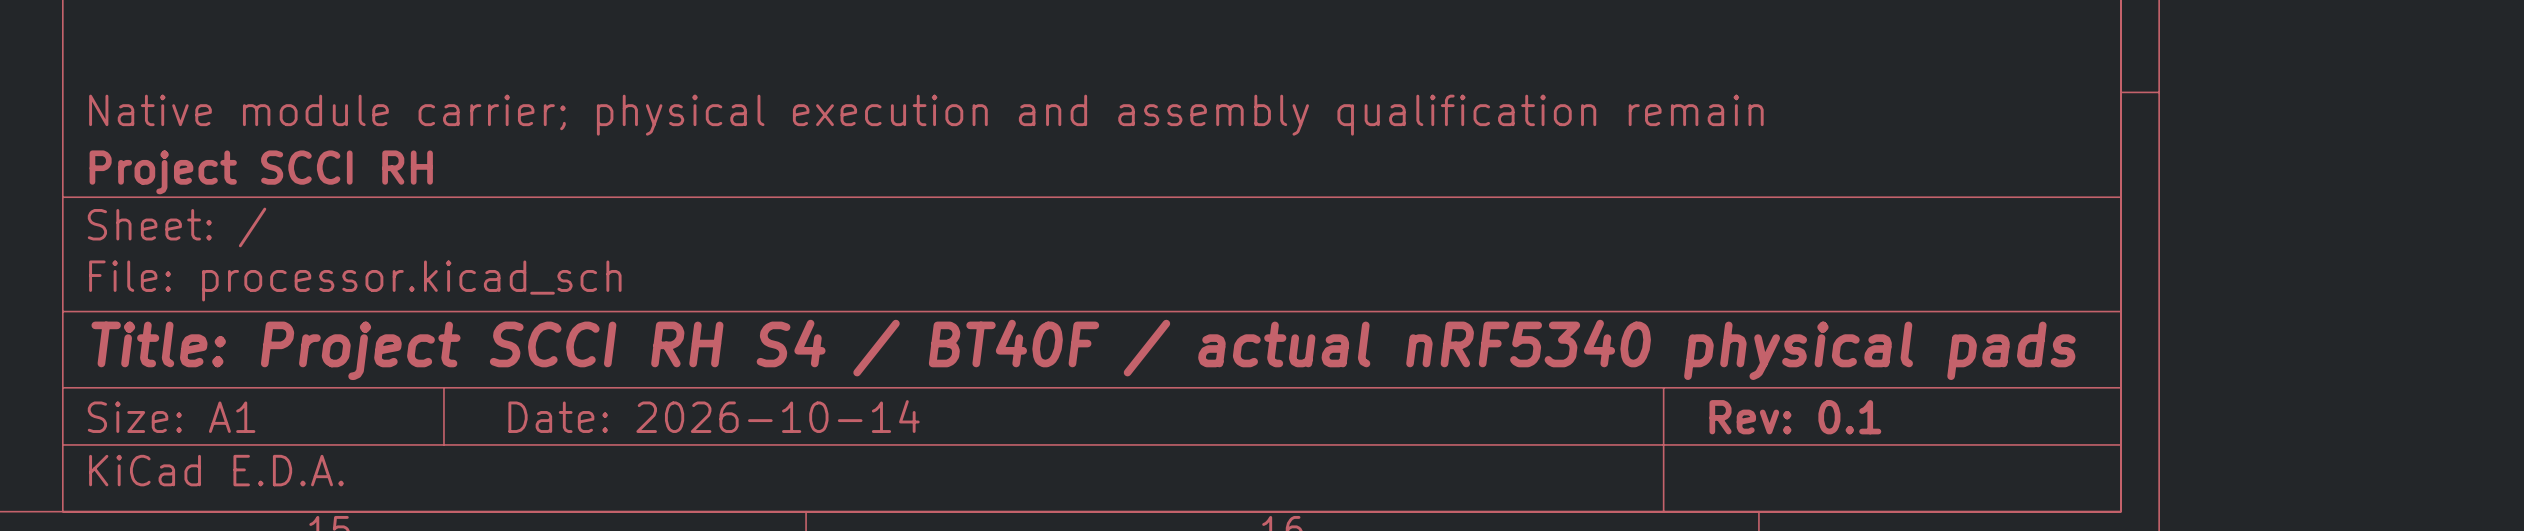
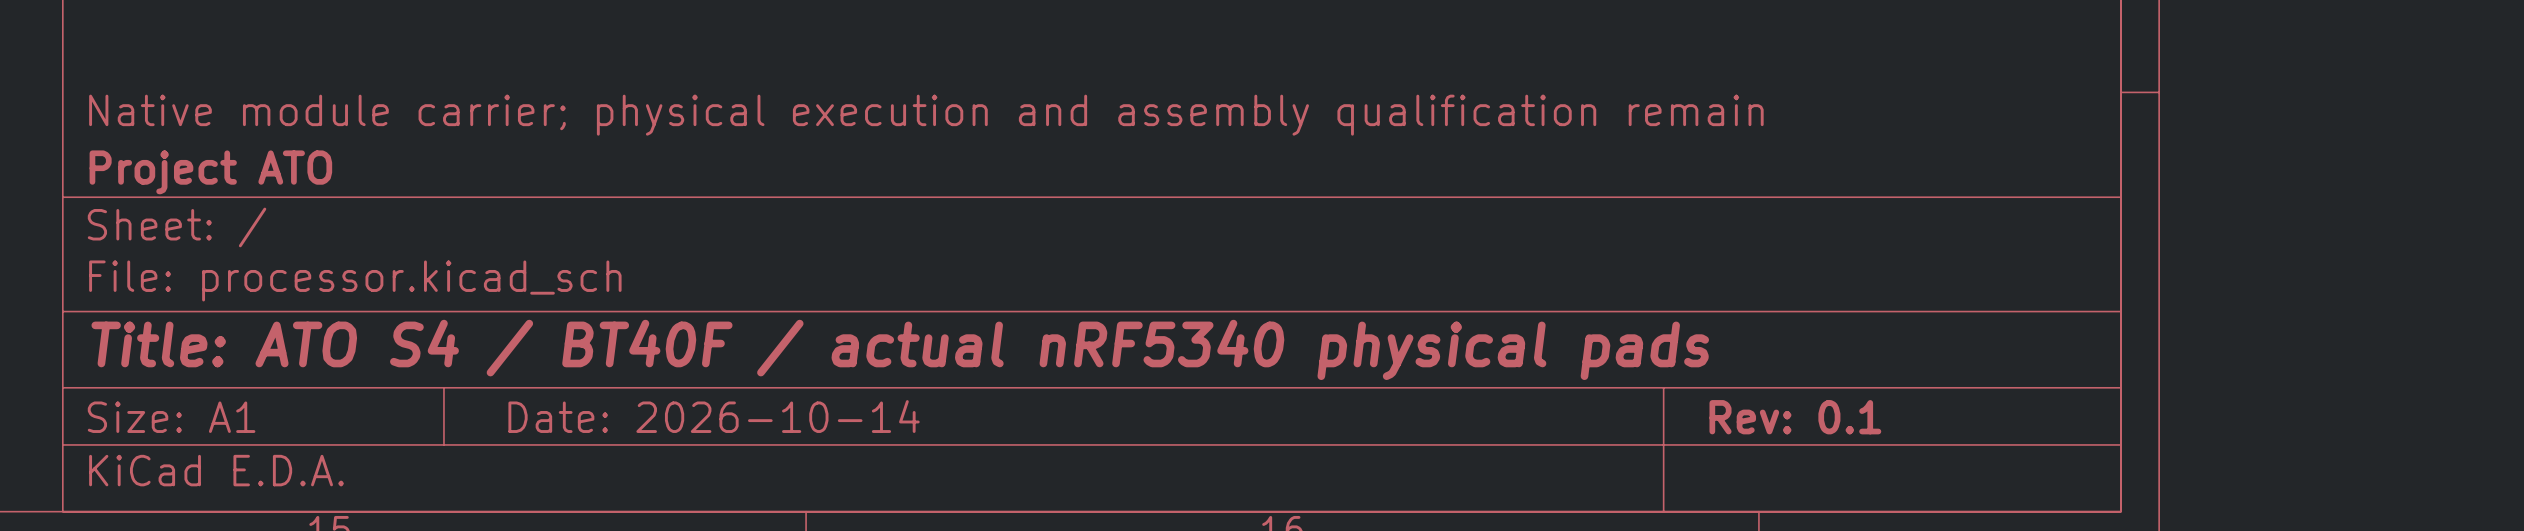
title block: Project SCCI RH (261, 172) -> Project ATO (210, 172)
title block: Title: Project SCCI RH S4 / BT40F / actual nRF5340 physical pads (1083, 349) -> Title: ATO S4 / BT40F / actual nRF5340 physical pads (900, 349)

